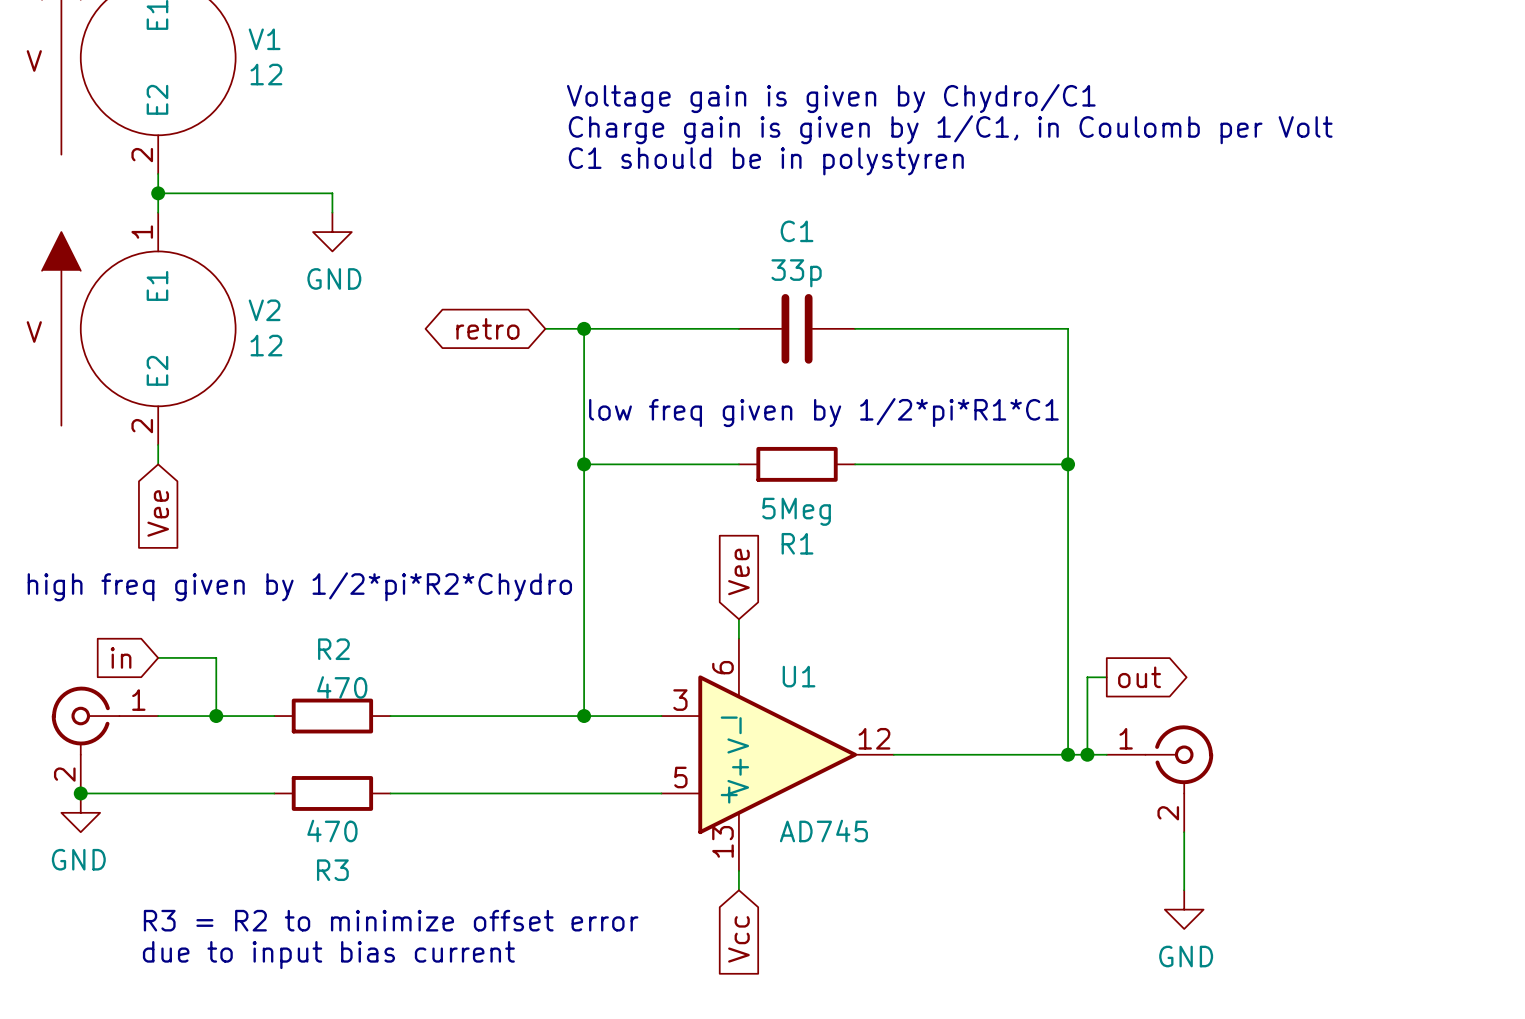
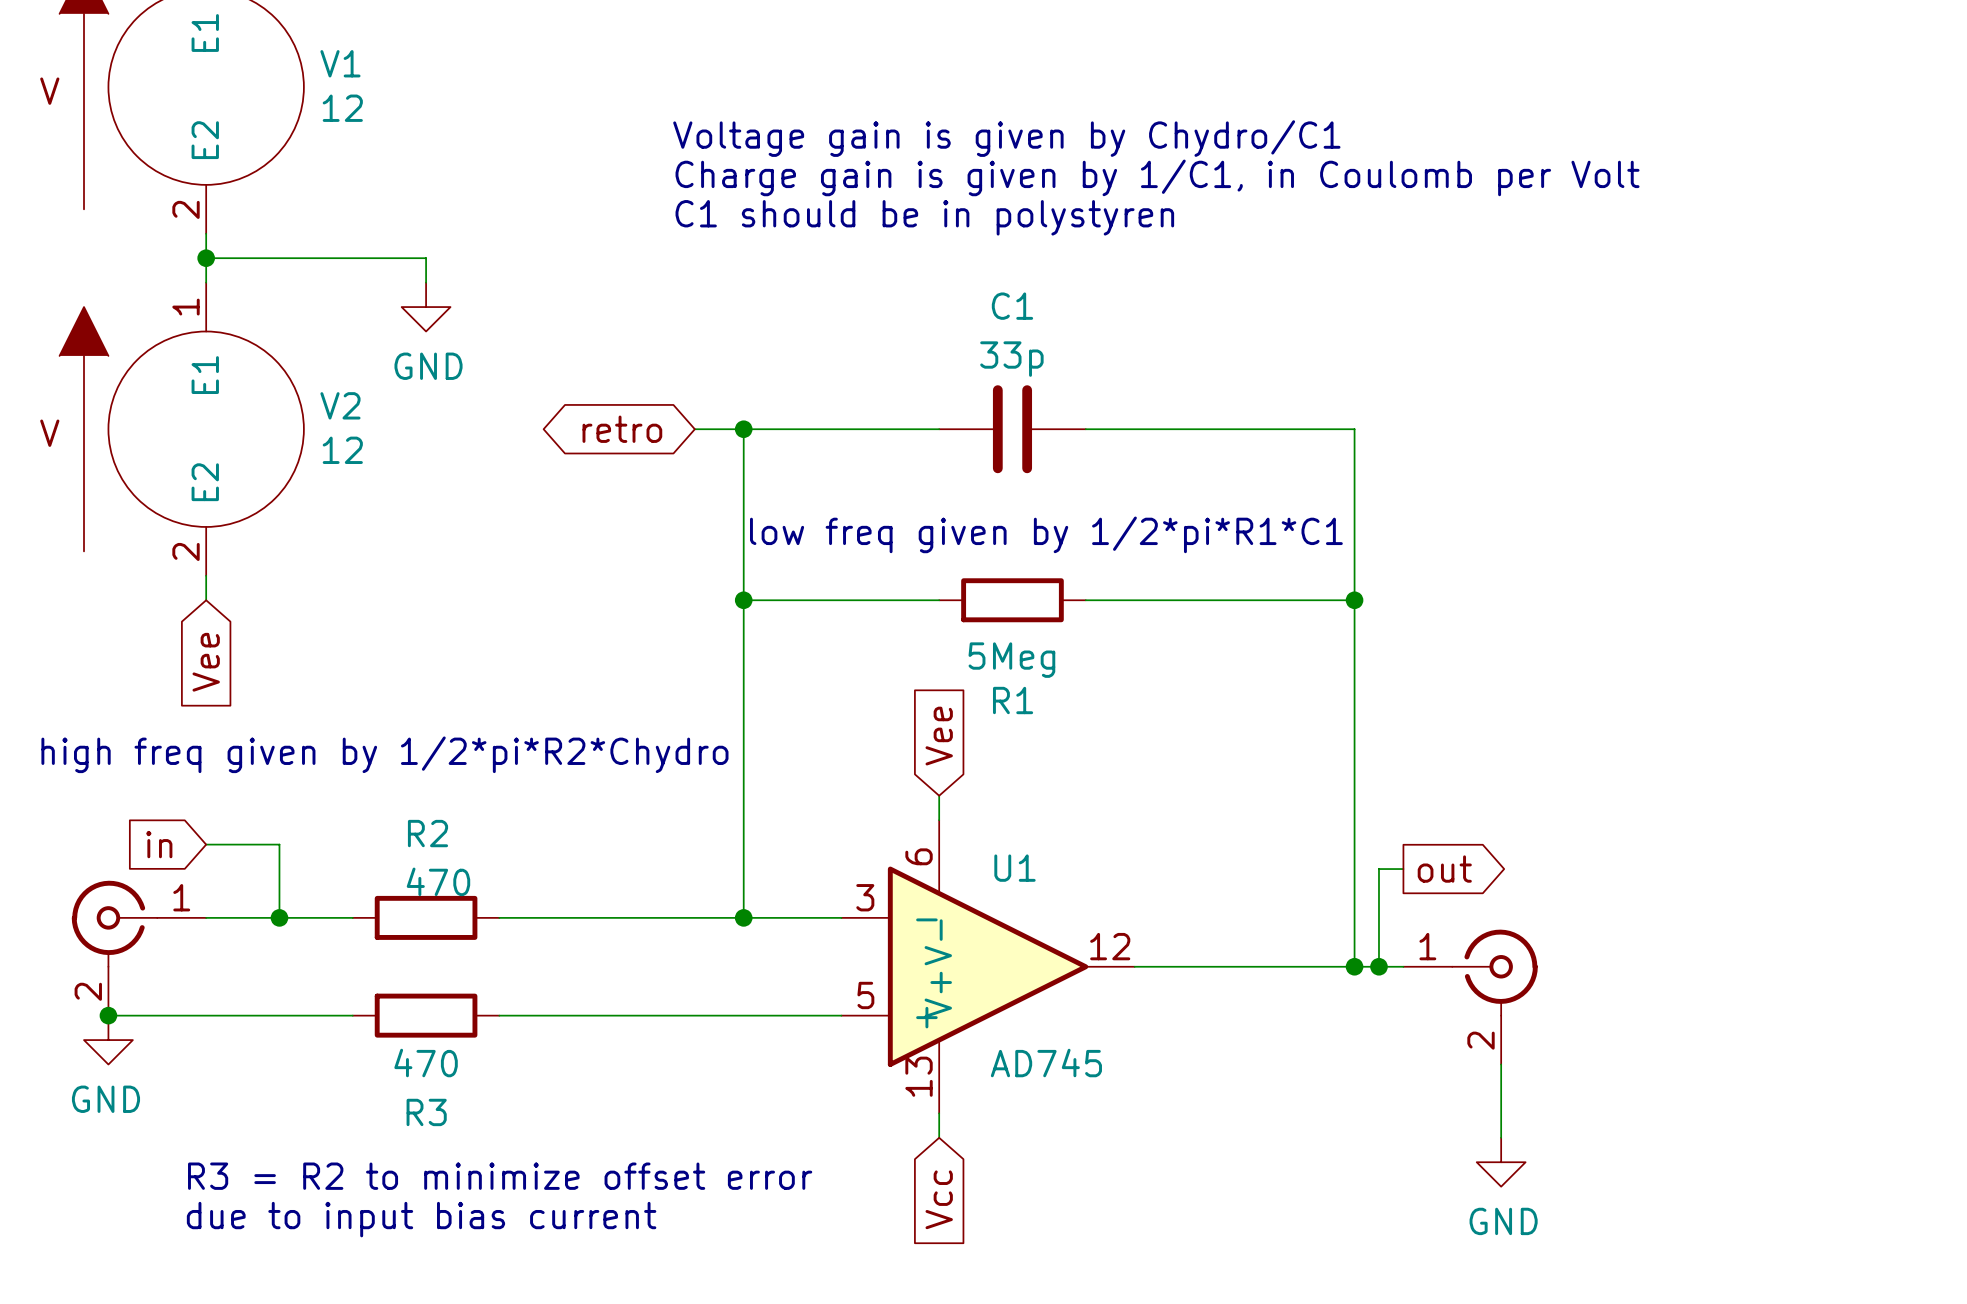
text position: Voltage gain is given by Chydro/C1 (831, 98) -> Voltage gain is given by Chydro/C1 (1006, 138)
text position: Charge gain is given by 1/C1, in Coulomb per Volt (950, 129) -> Charge gain is given by 1/C1, in Coulomb per Volt (1157, 177)
text position: C1 should be in polystyren (766, 161) -> C1 should be in polystyren (924, 217)

